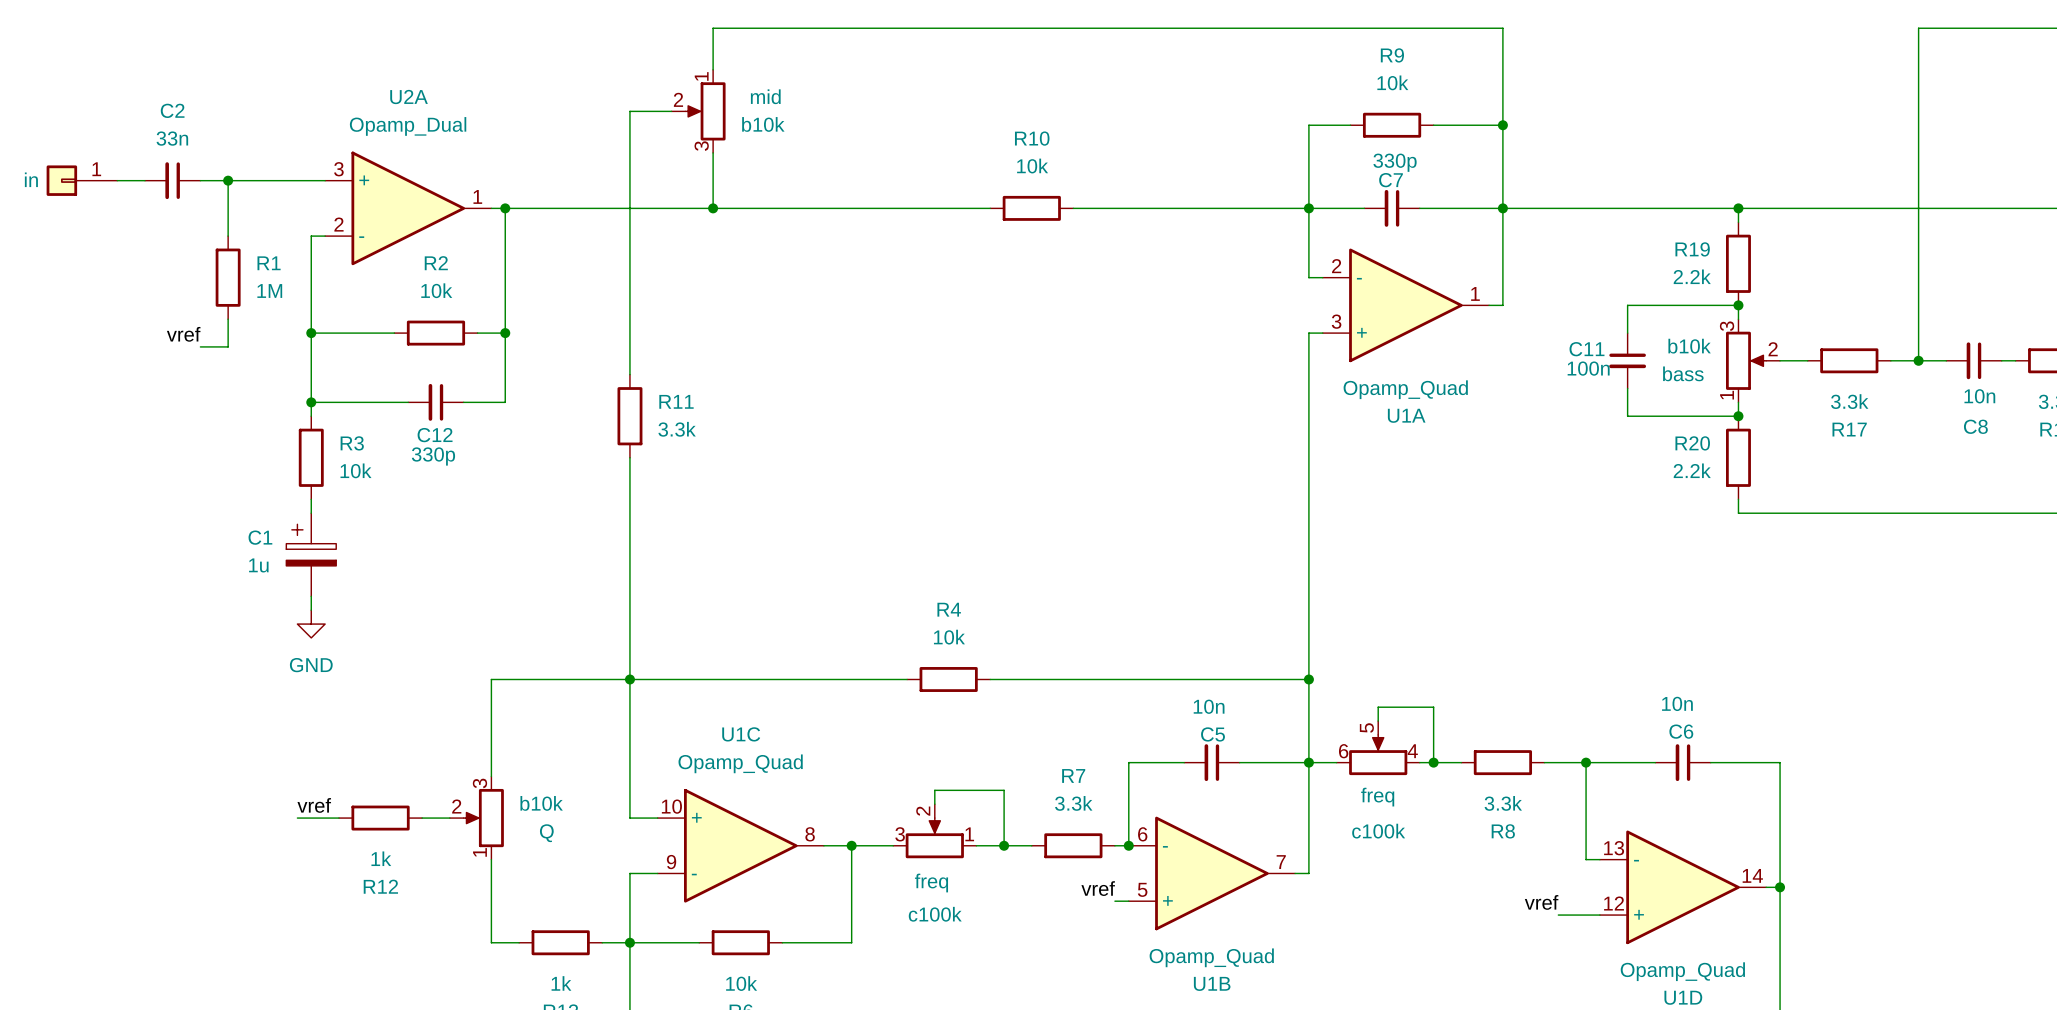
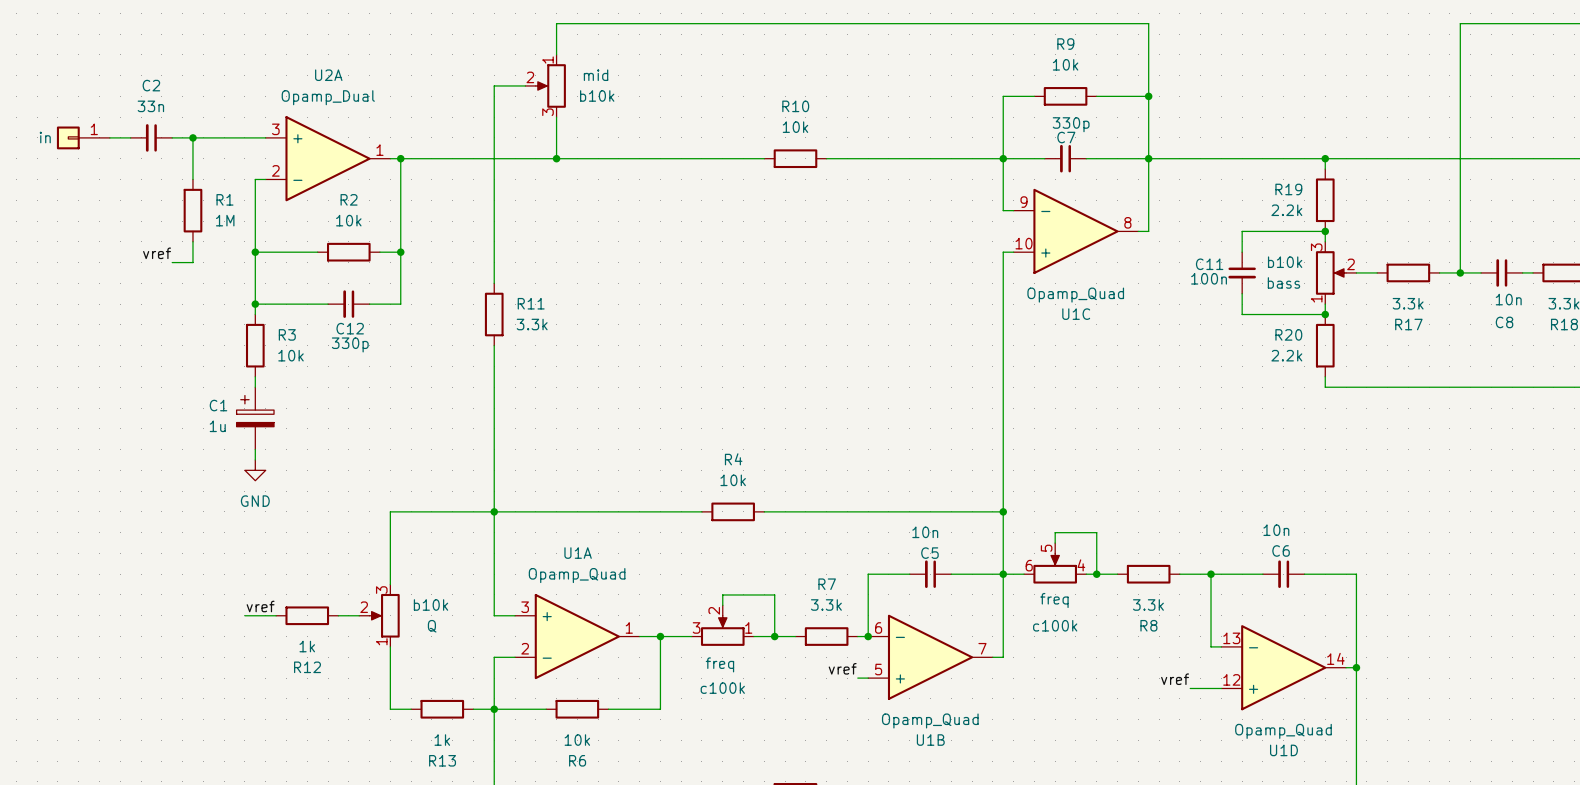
U1A flip: as is (1405, 305) -> up-down (577, 636)
U1A position: (1405, 305) -> (577, 636)
U1C flip: as is (740, 845) -> up-down (1075, 231)
U1C position: (740, 845) -> (1075, 231)

